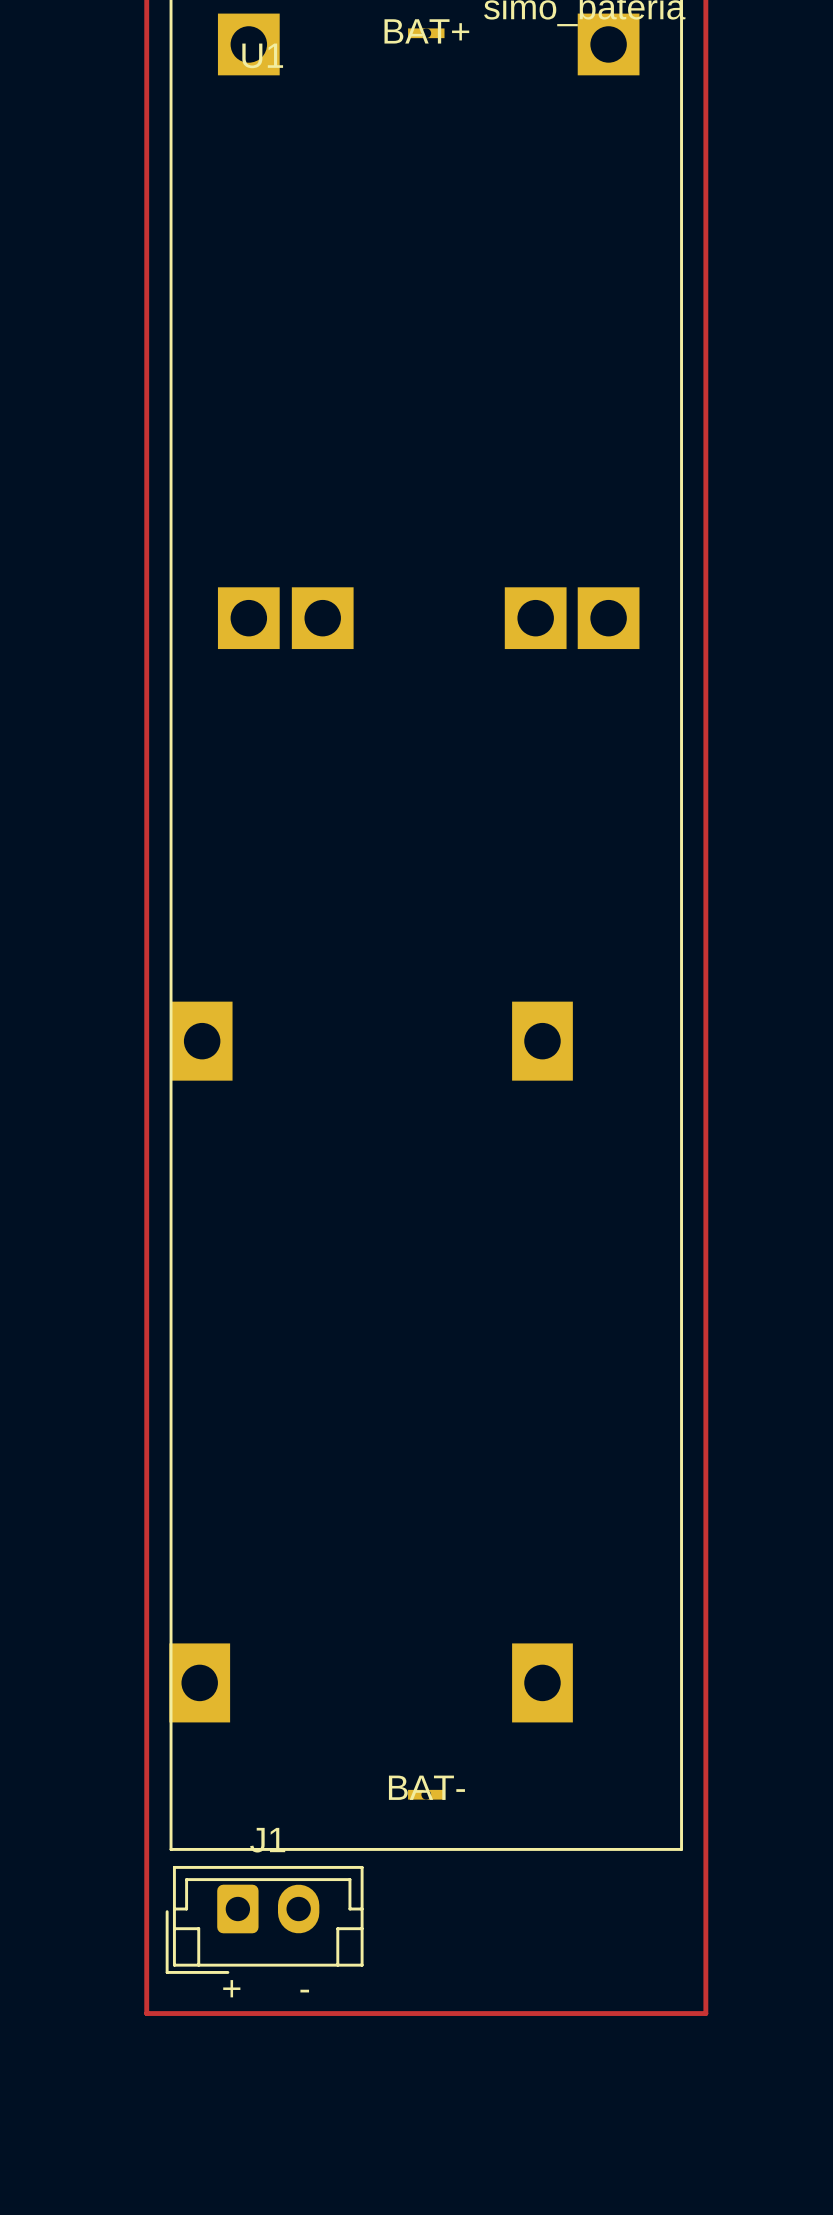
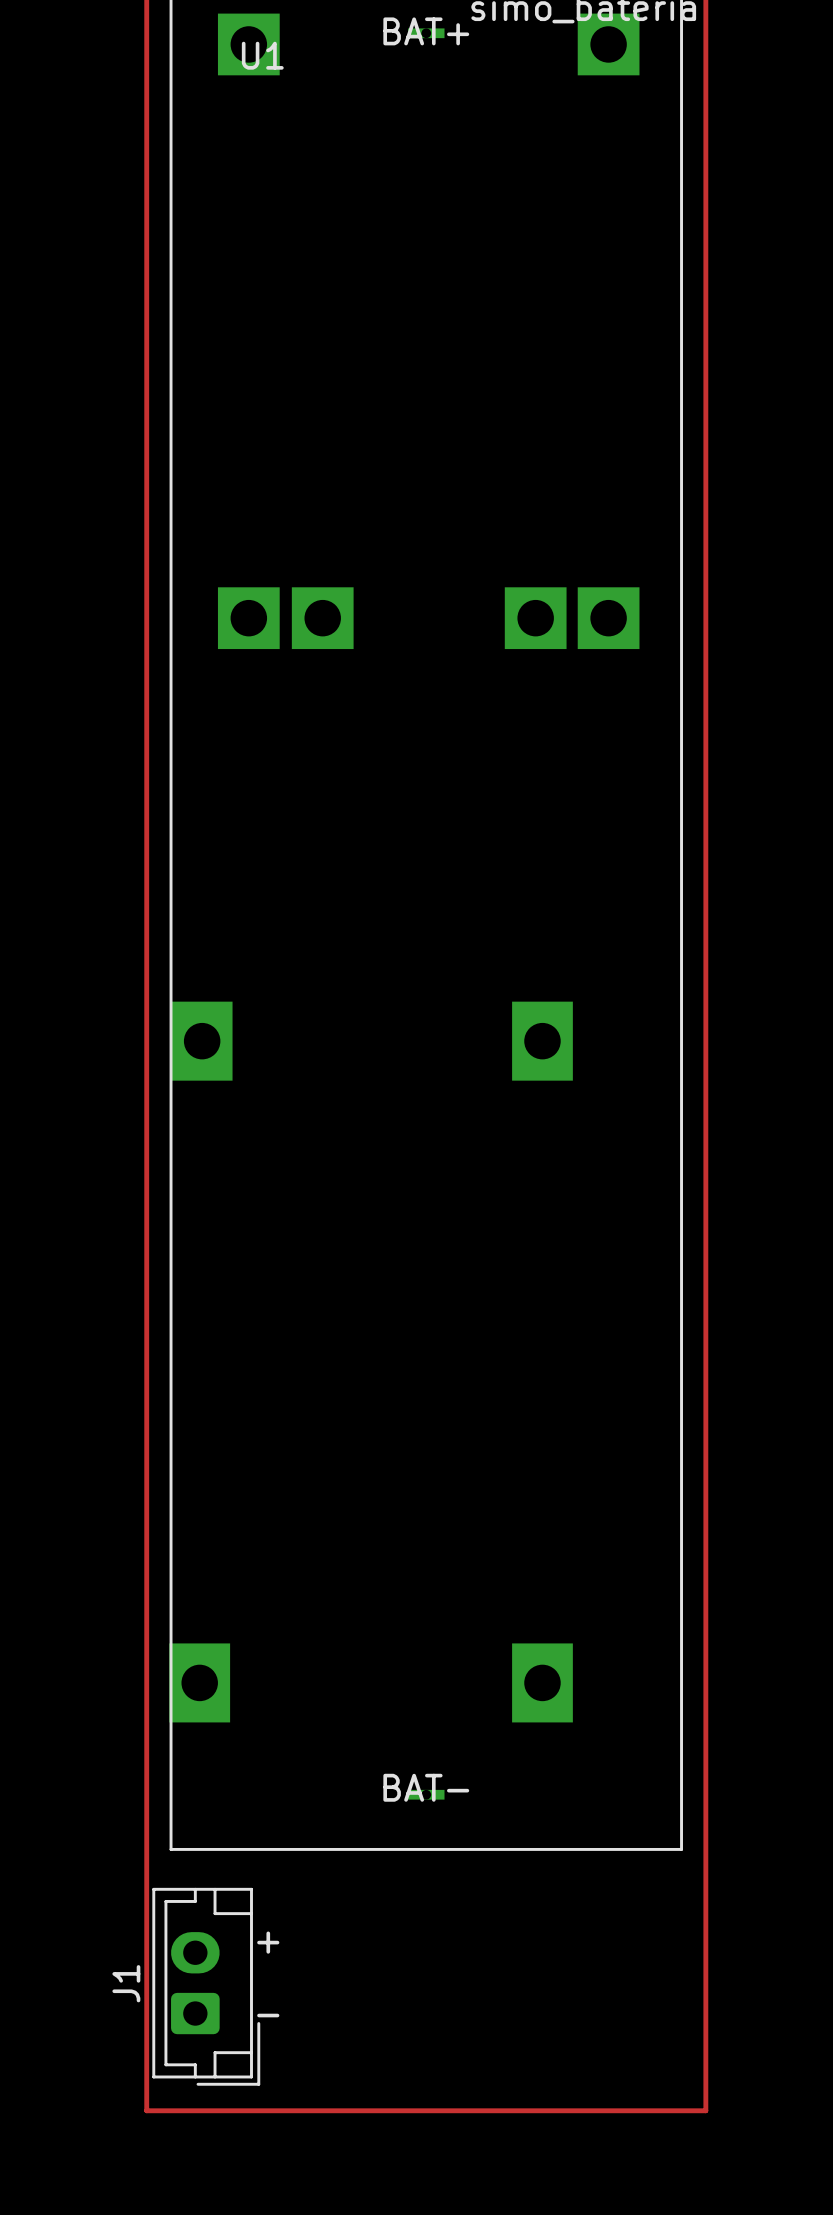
J1 rotation: 0° (264, 1919) -> 90° counterclockwise (206, 1986)
text position: + (231, 1988) -> + (268, 1942)
text position: - (304, 1991) -> - (268, 2015)
top track: (146, 2013) (705, 2013) -> (146, 2013) (146, 2110) (705, 2110) (705, 2013)

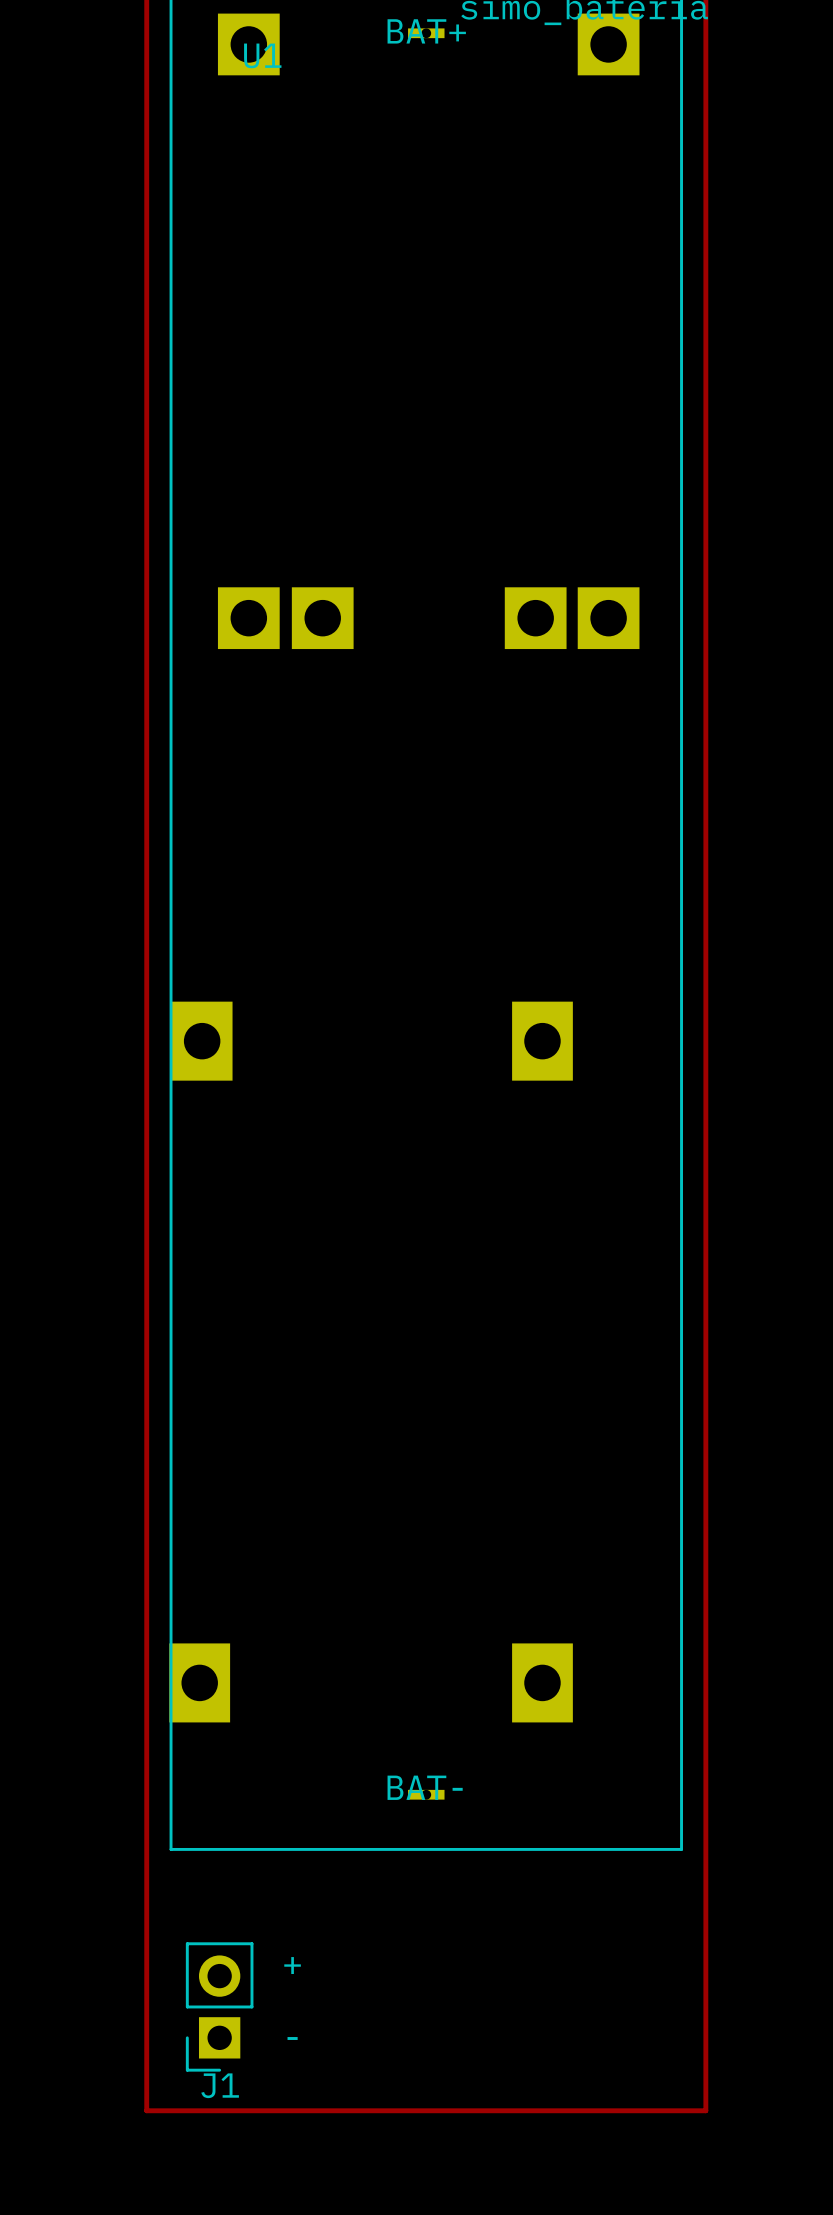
J1 footprint: [152, 1887, 261, 2086] -> [185, 1942, 254, 2072]
text position: + (268, 1942) -> + (292, 1965)
J1 name position: J1 (126, 1983) -> J1 (220, 2085)
text position: - (268, 2015) -> - (292, 2038)

